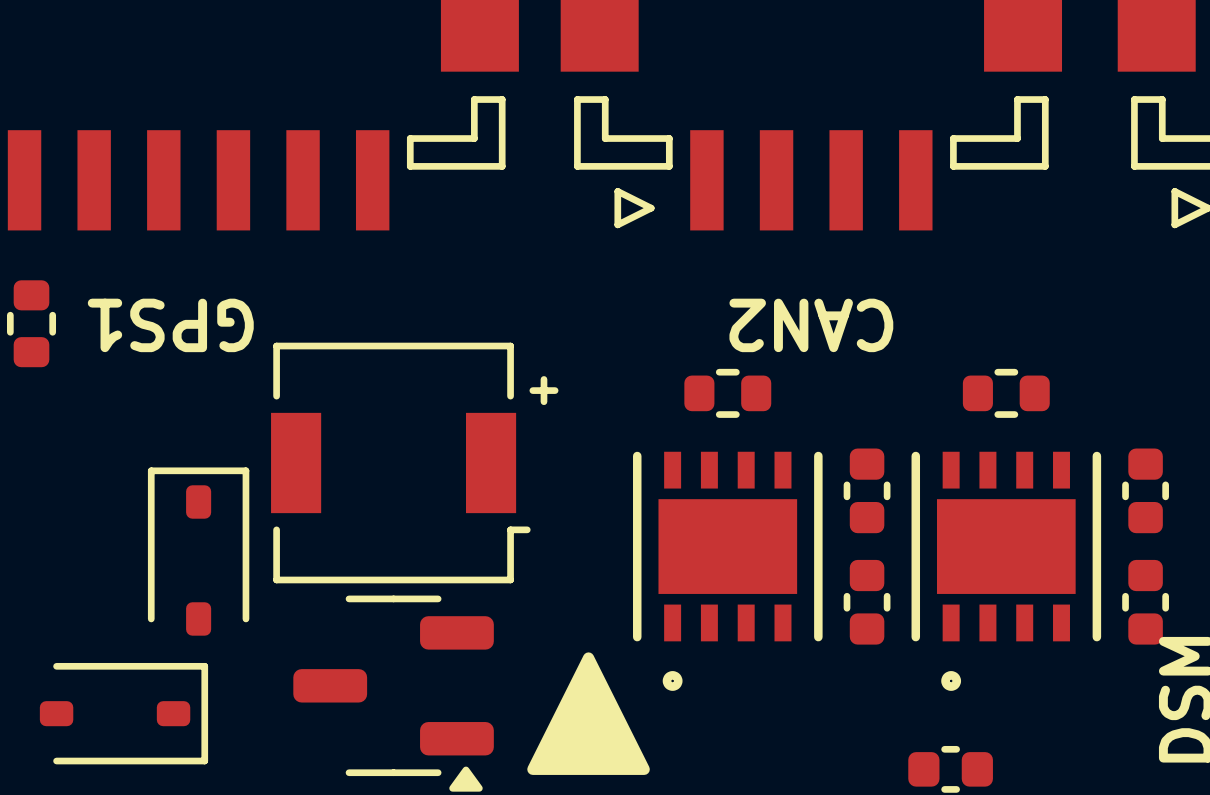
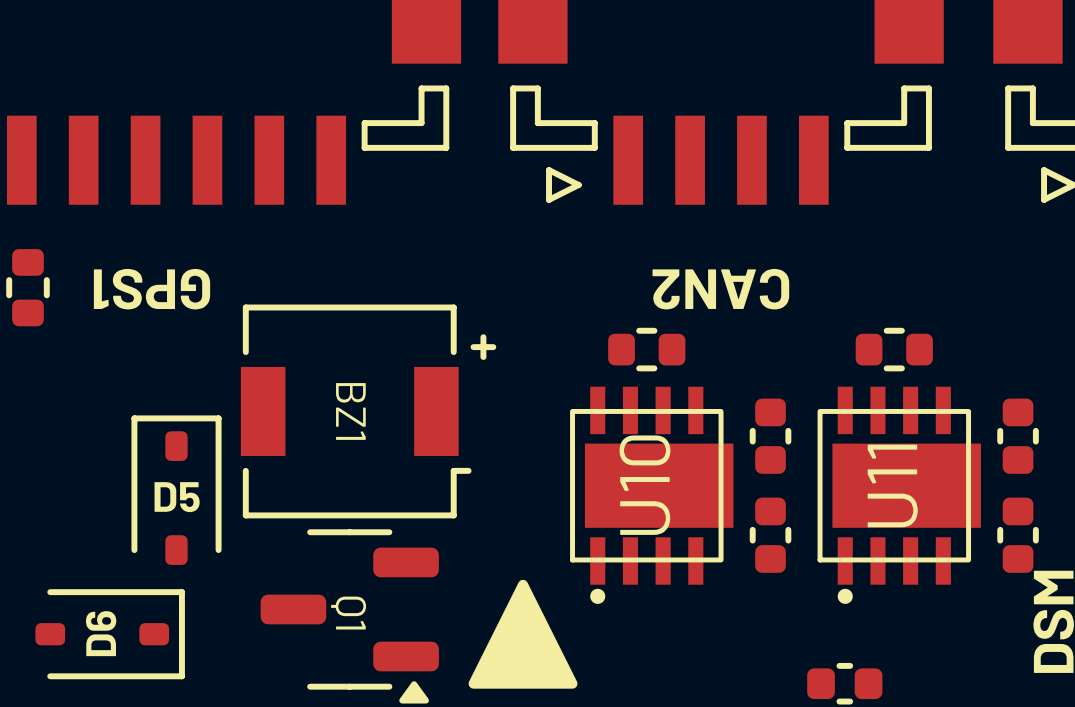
BZ1 name: none -> BZ1 (350, 411)
U10: none -> (651, 495)
U11: none -> (899, 495)
D5 name: none -> D5 (177, 497)
part: (727, 571) -> none
part: (1006, 571) -> none
Q1 name: none -> Q1 (348, 613)
D6 name: none -> D6 (101, 633)

